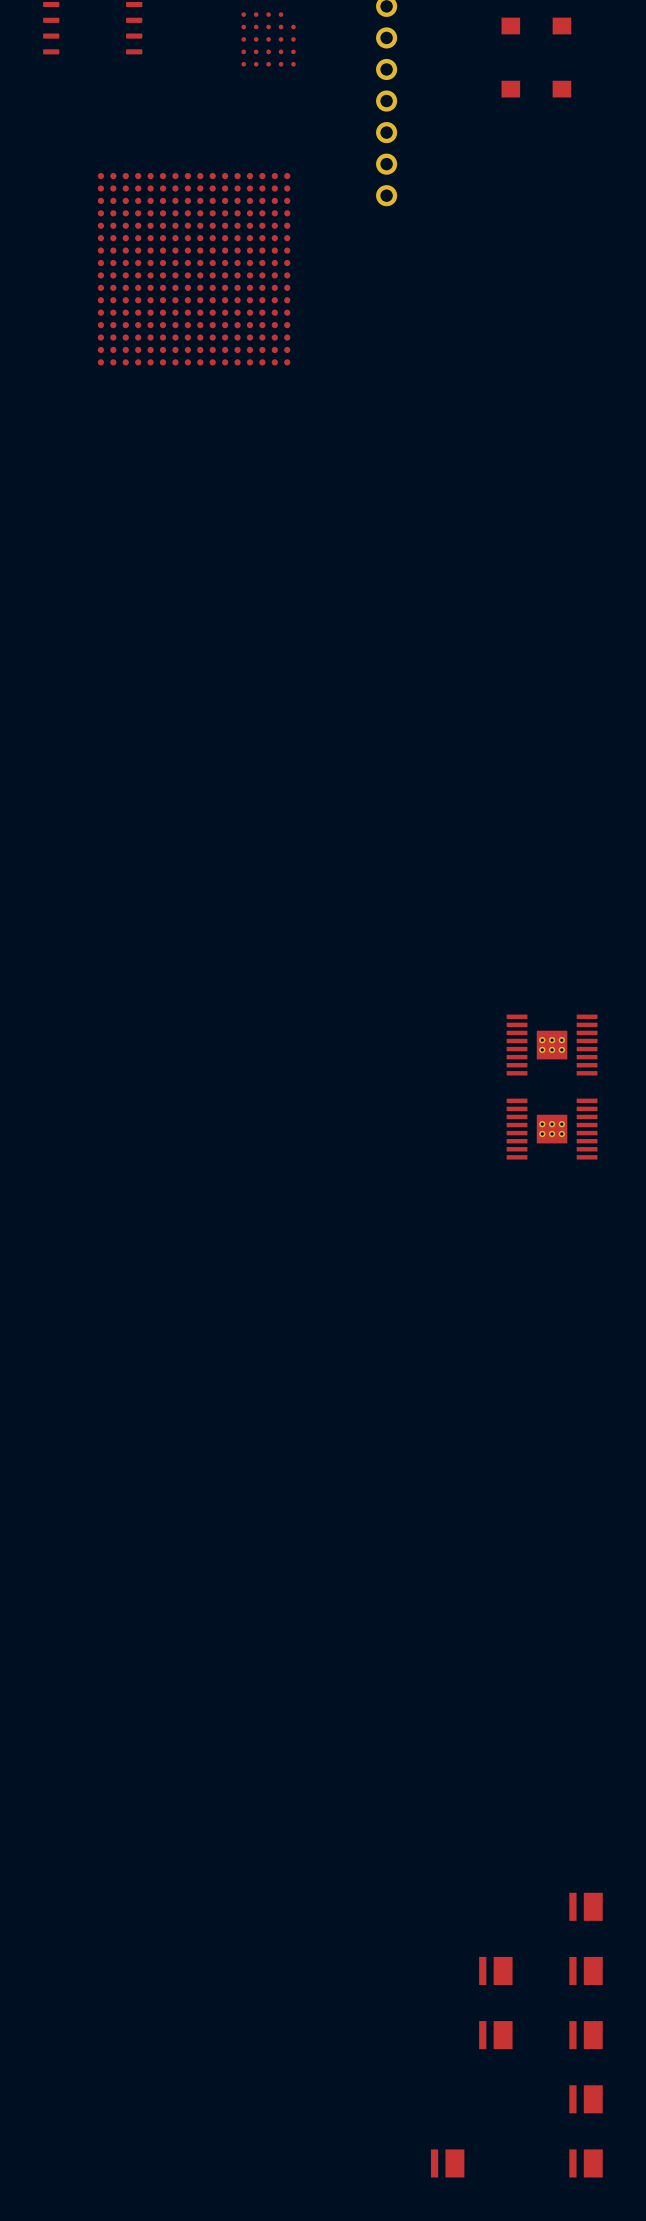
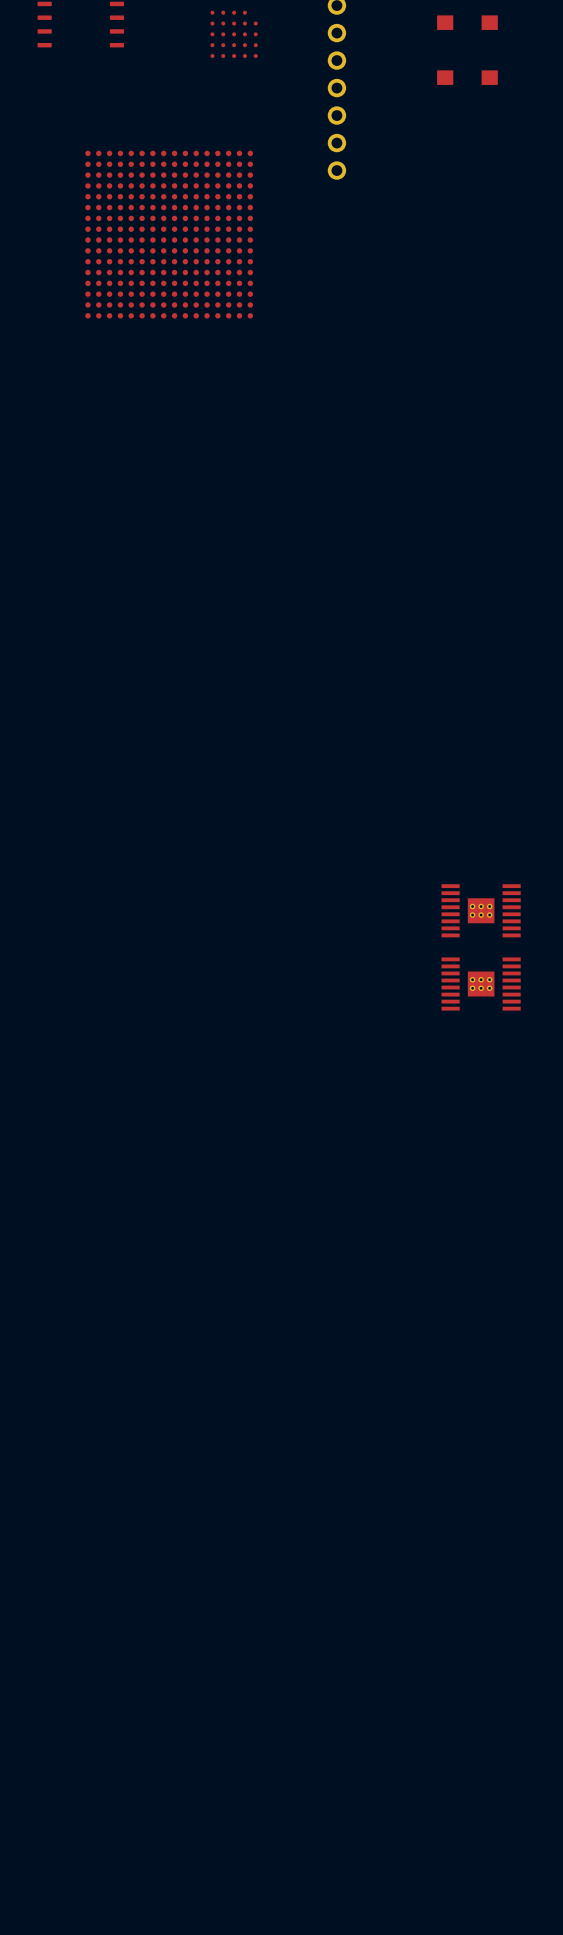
part: (586, 1906) -> none
part: (495, 1970) -> none
part: (586, 1970) -> none
part: (495, 2035) -> none
part: (586, 2035) -> none
part: (586, 2099) -> none
part: (447, 2163) -> none
part: (586, 2163) -> none

